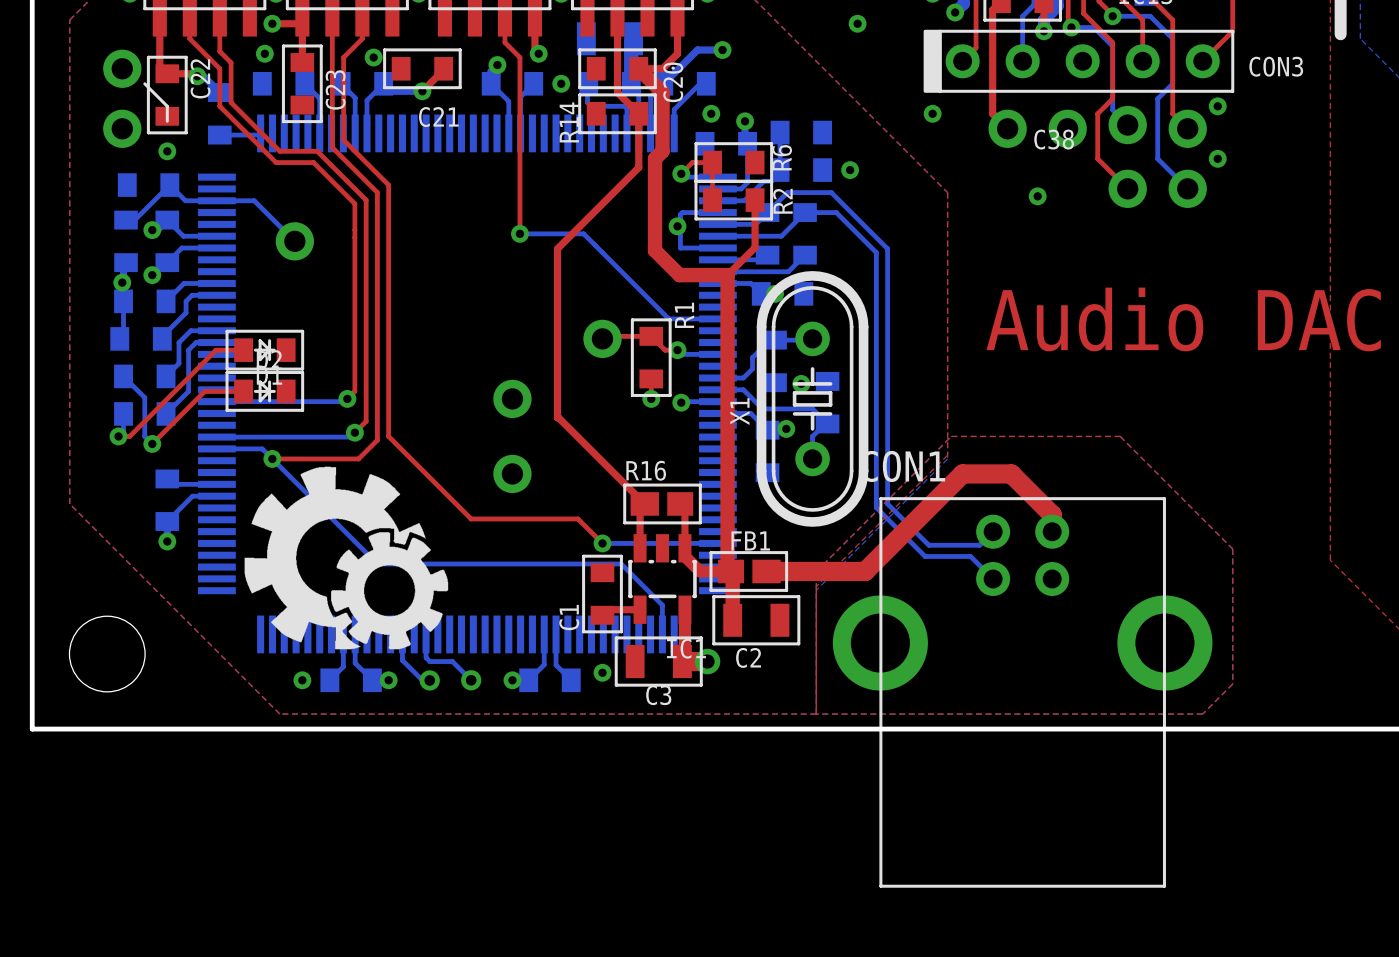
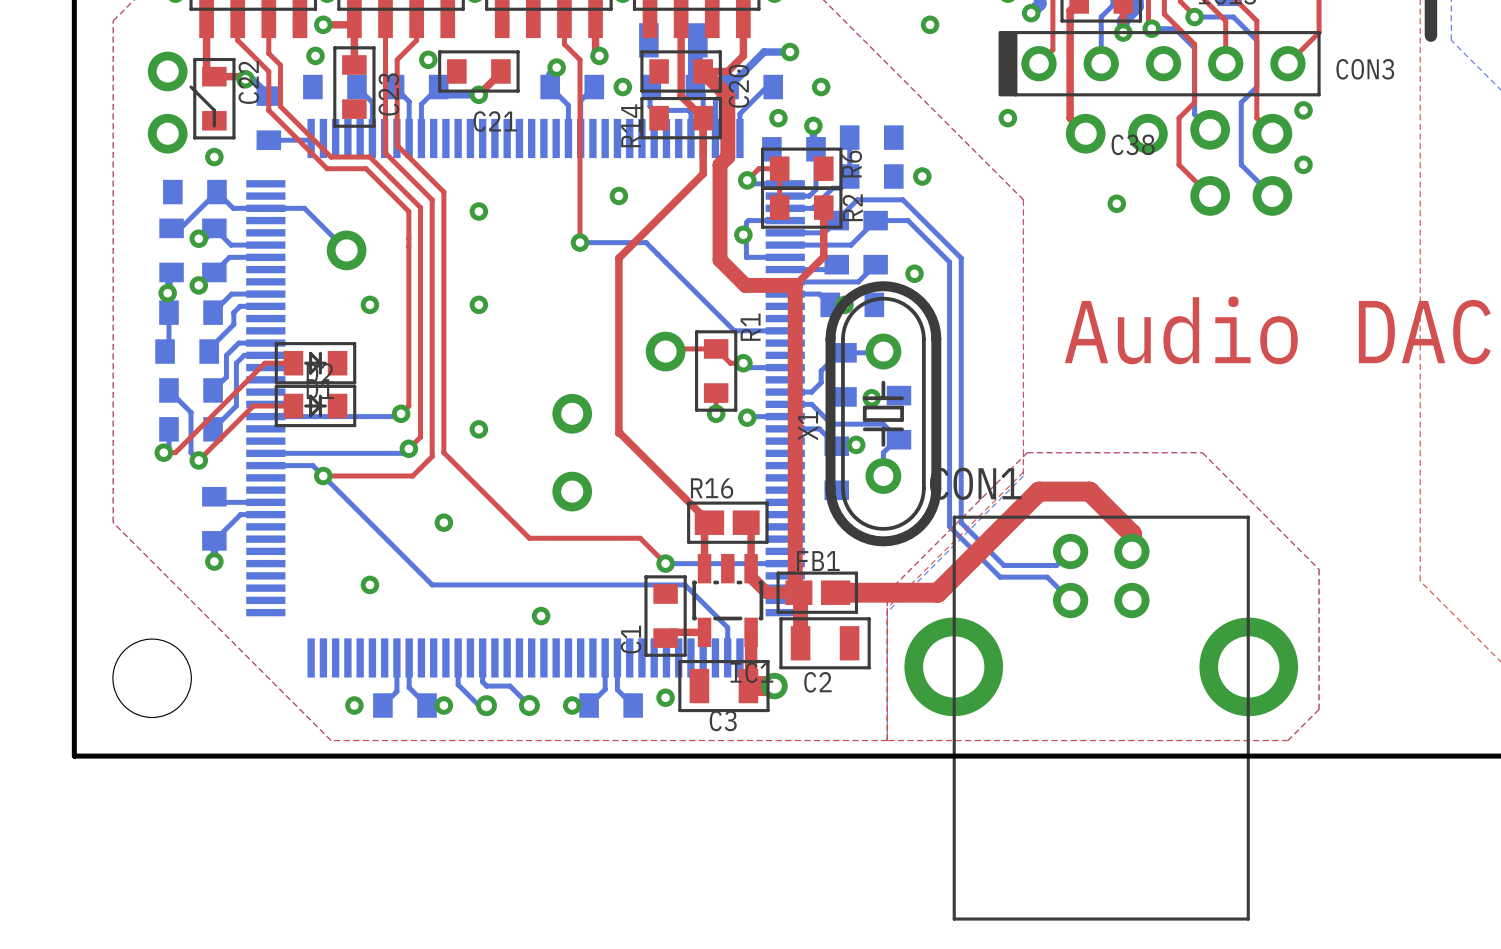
via: none -> (821, 87)
via: none -> (618, 195)
via: none -> (478, 211)
via: none -> (914, 273)
via: none -> (369, 304)
via: none -> (478, 304)
via: none -> (478, 429)
drawing: [244, 466, 449, 650] -> none
via: none -> (443, 522)
via: none -> (369, 584)
via: none -> (541, 616)

